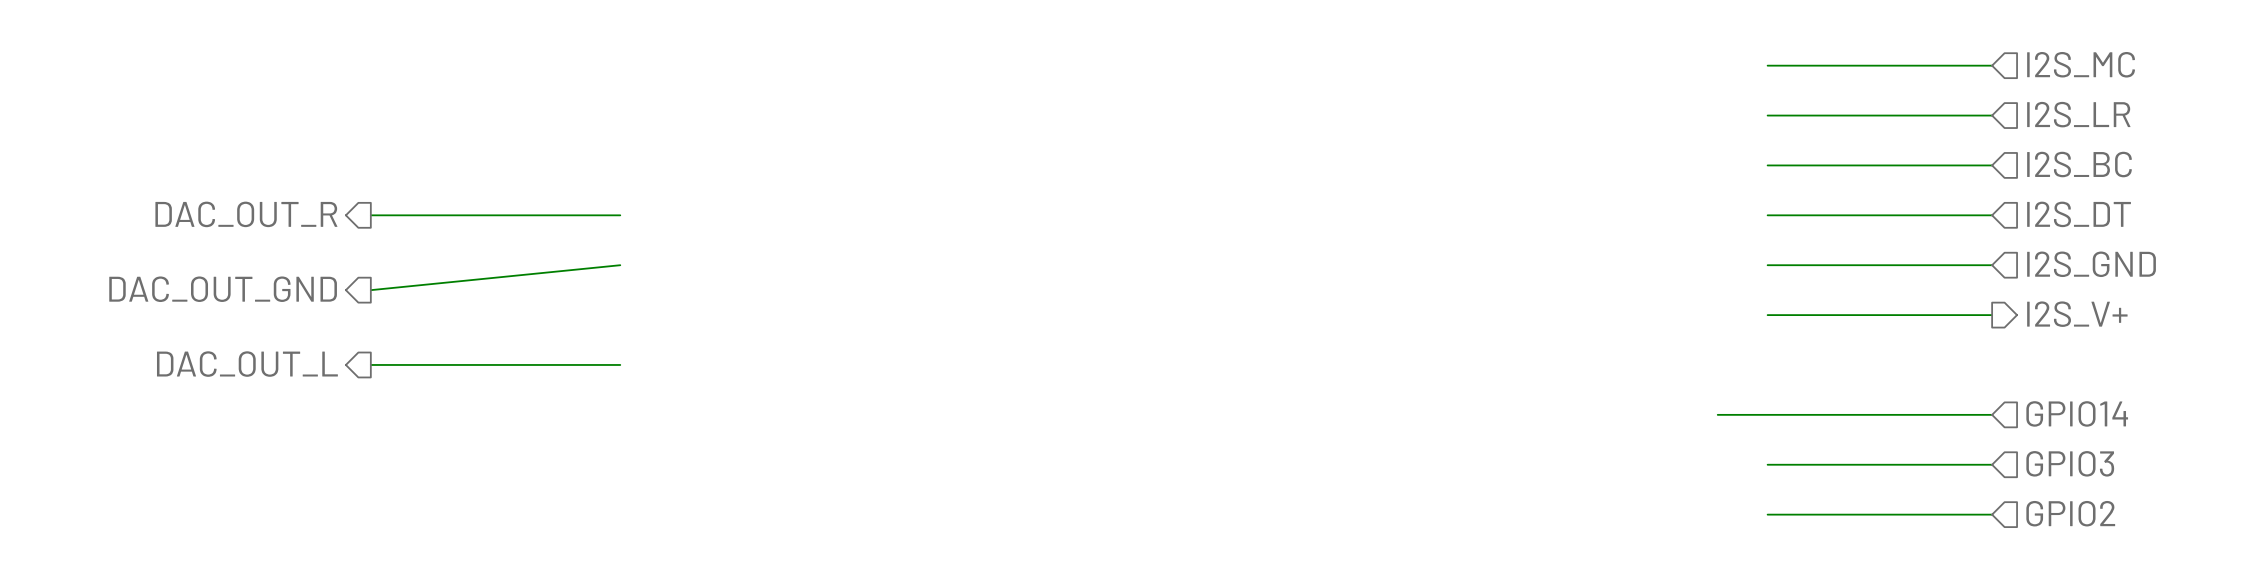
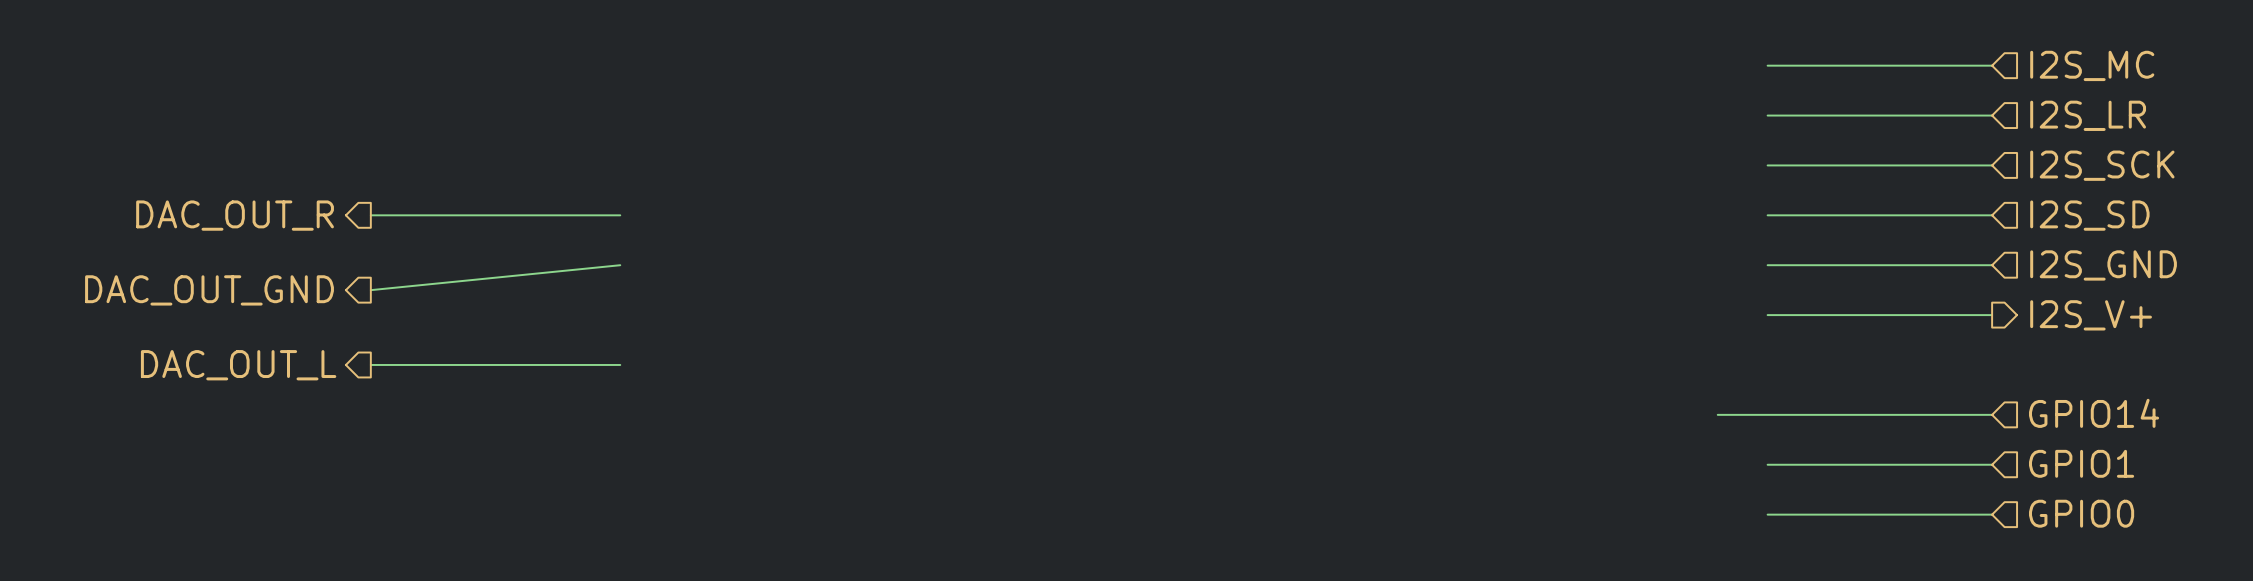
hierarchical label: I2S_BC (2079, 164) -> I2S_SCK (2102, 165)
hierarchical label: I2S_DT (2079, 214) -> I2S_SD (2089, 215)
hierarchical label: GPIO3 (2070, 463) -> GPIO1 (2081, 463)
hierarchical label: GPIO2 (2070, 513) -> GPIO0 (2081, 513)

